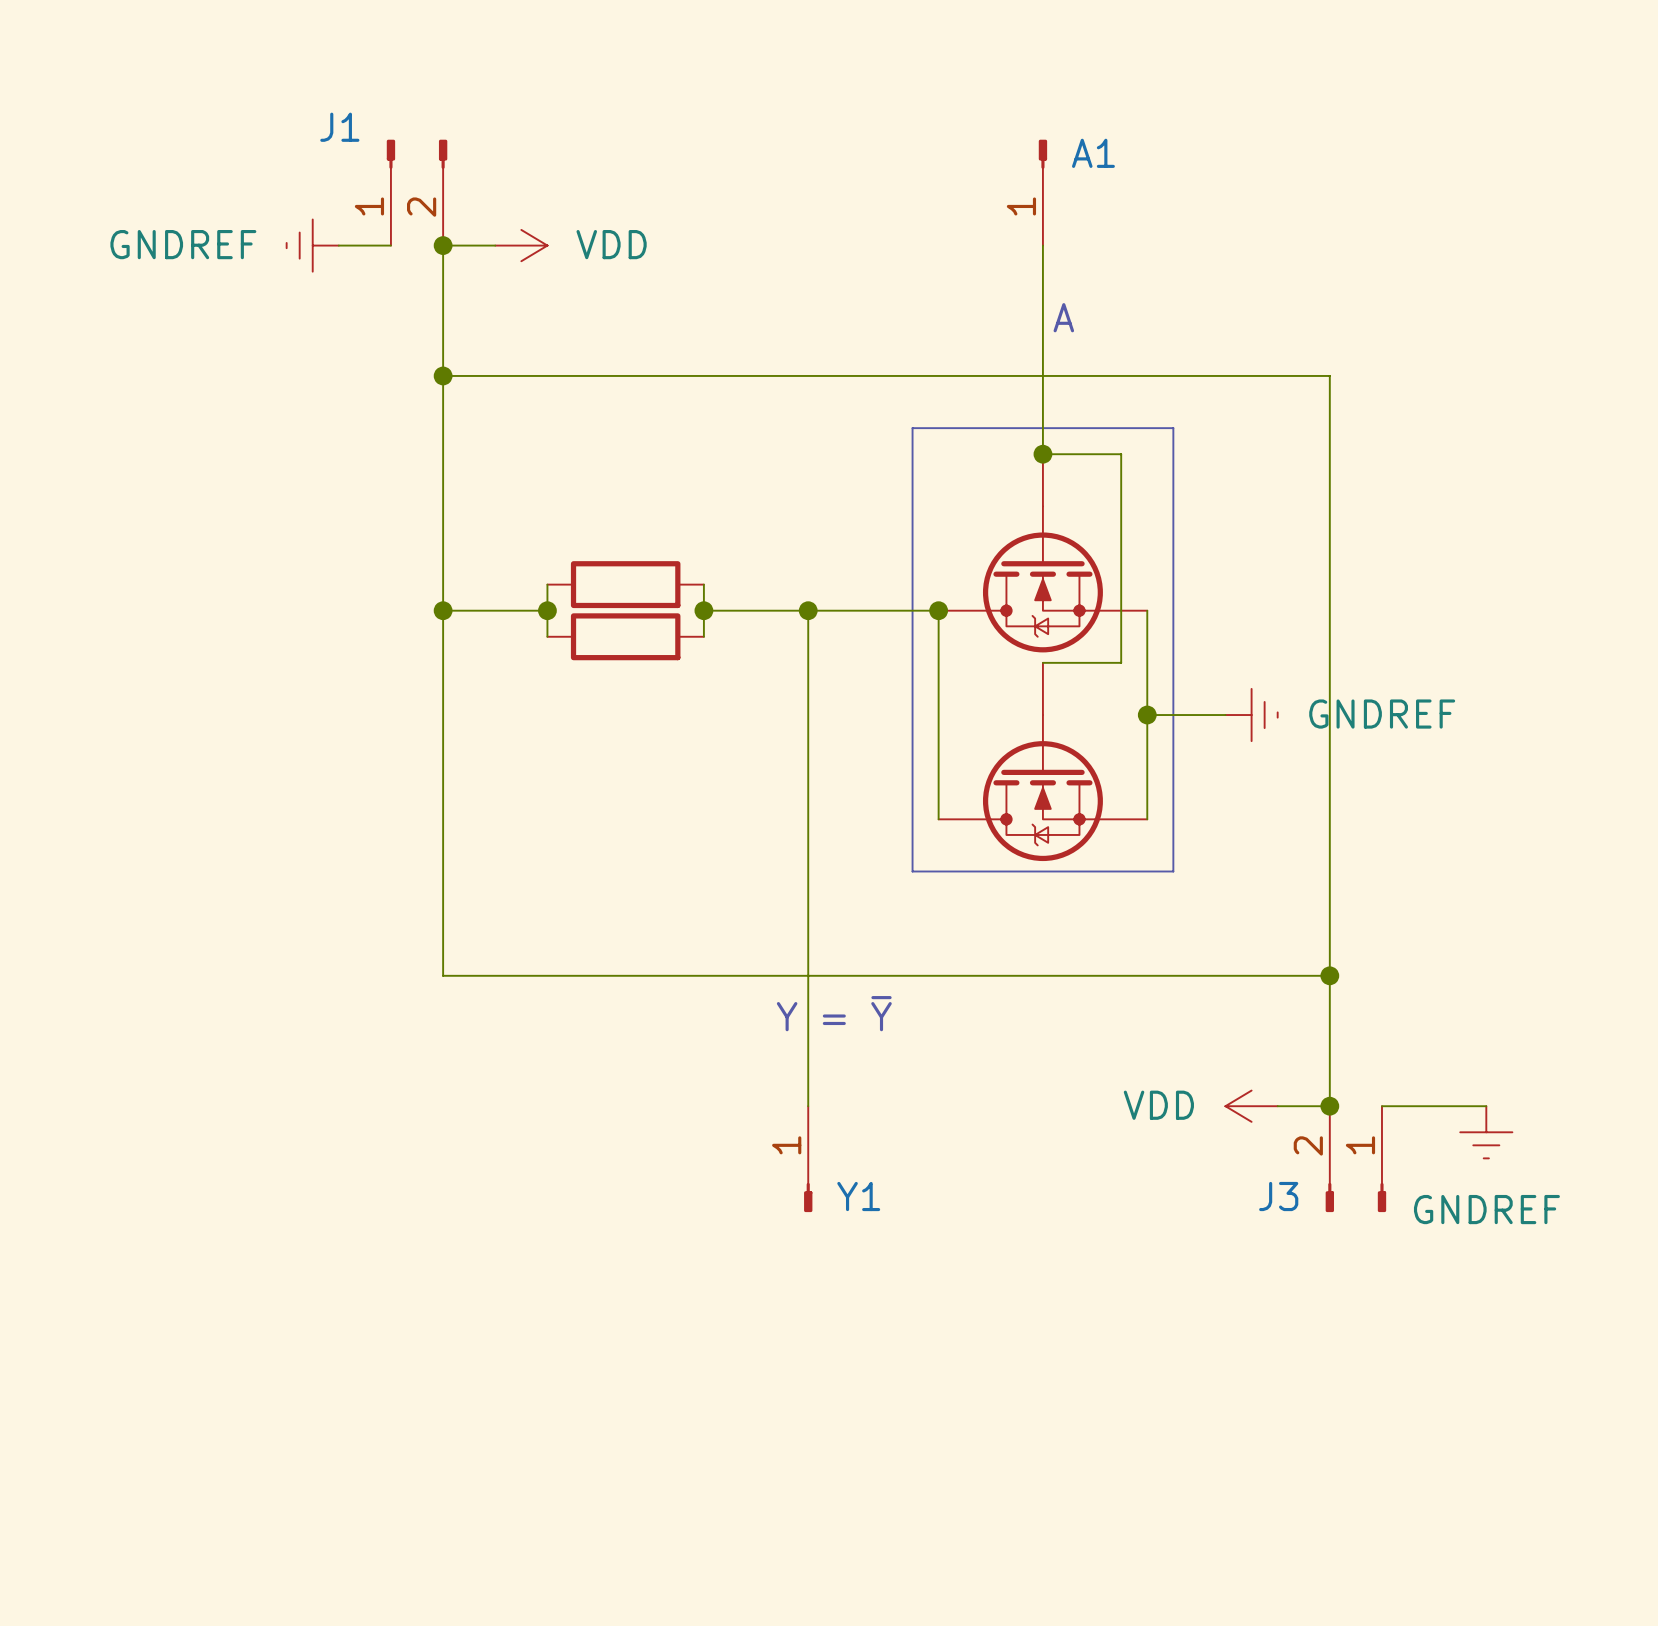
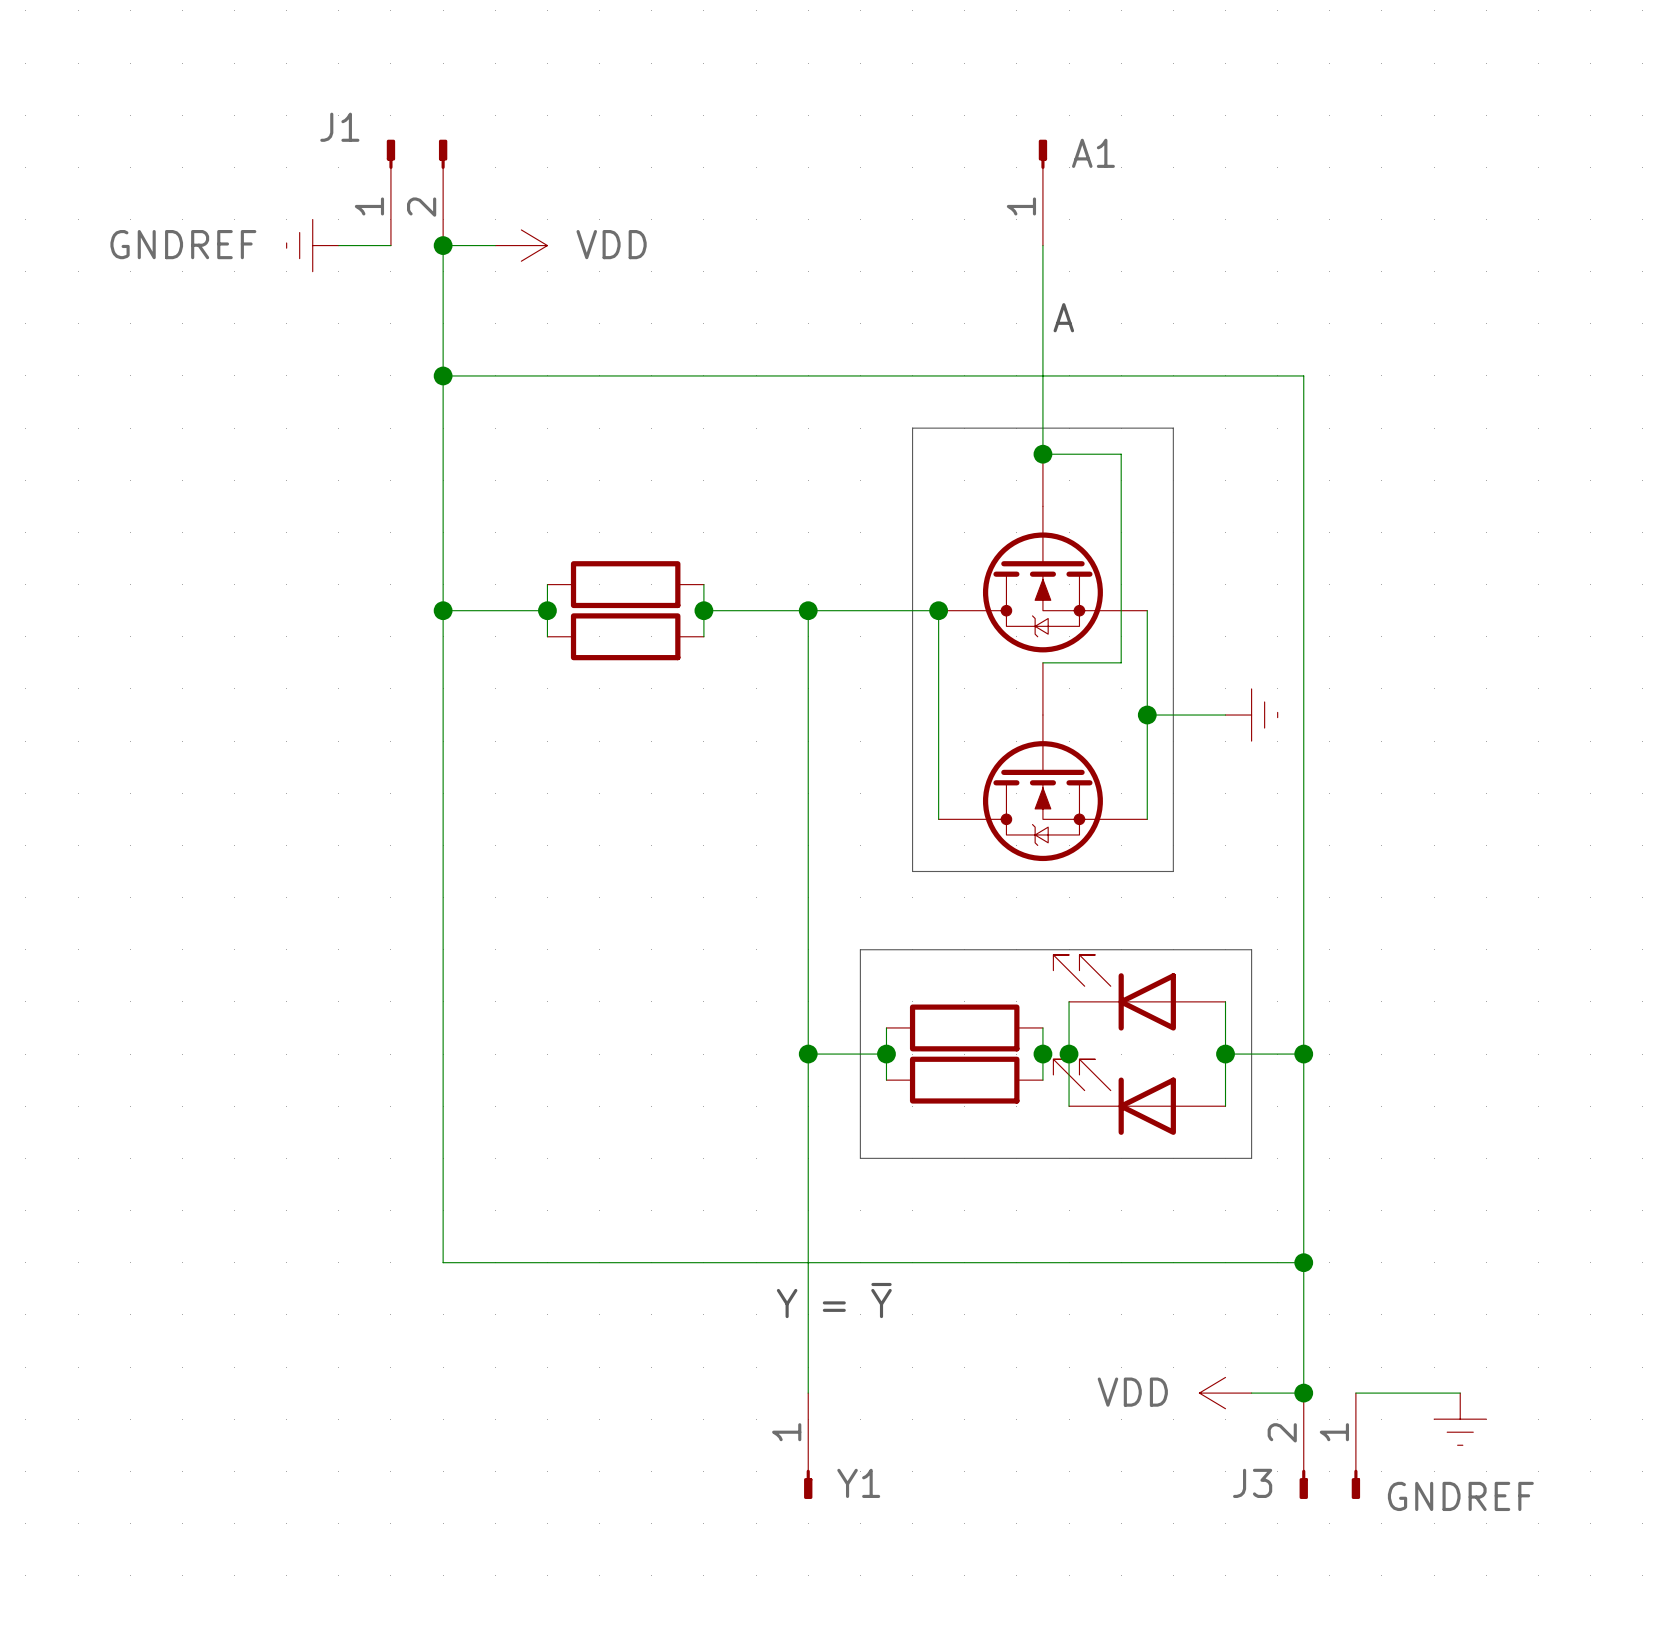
wire: (1303, 375) (1329, 375) (1329, 1106) (1277, 1106) -> (1303, 375) (1303, 1393) (1251, 1393)
power symbol text: GNDREF (1382, 714) -> none
line: none -> (860, 949) (1251, 949) (1251, 1158) (860, 1158) (860, 949)
wire: (443, 975) (1329, 975) -> (443, 975) (443, 1262) (1303, 1262)
junction: (1329, 975) -> none
part: none -> (1139, 992)
wire: none -> (1069, 1001) (1069, 1106)
wire: none -> (1225, 1001) (1225, 1106)
text position: Y = ~{Y} (834, 1013) -> Y = ~{Y} (834, 1300)
wire: none -> (886, 1027) (886, 1080)
part: none -> (964, 1027)
wire: none -> (1042, 1027) (1042, 1080)
wire: none -> (808, 1054) (886, 1054)
junction: none -> (808, 1054)
junction: none -> (886, 1054)
junction: none -> (1042, 1054)
junction: none -> (1069, 1054)
wire: none -> (1225, 1054) (1303, 1054)
junction: none -> (1225, 1054)
junction: none -> (1303, 1054)
part: none -> (964, 1080)
part: none -> (1139, 1097)
wire: none -> (808, 1106) (808, 1393)
power symbol position: VDD (1251, 1106) -> VDD (1225, 1393)
junction: (1329, 1106) -> none
wire: (1381, 1106) (1486, 1106) -> (1355, 1393) (1460, 1393)
power symbol position: GNDREF (1486, 1132) -> GNDREF (1460, 1419)
Y1 position: (808, 1159) -> (808, 1446)
J3 position: (1355, 1159) -> (1329, 1446)
junction: none -> (1303, 1262)
junction: none -> (1303, 1393)

